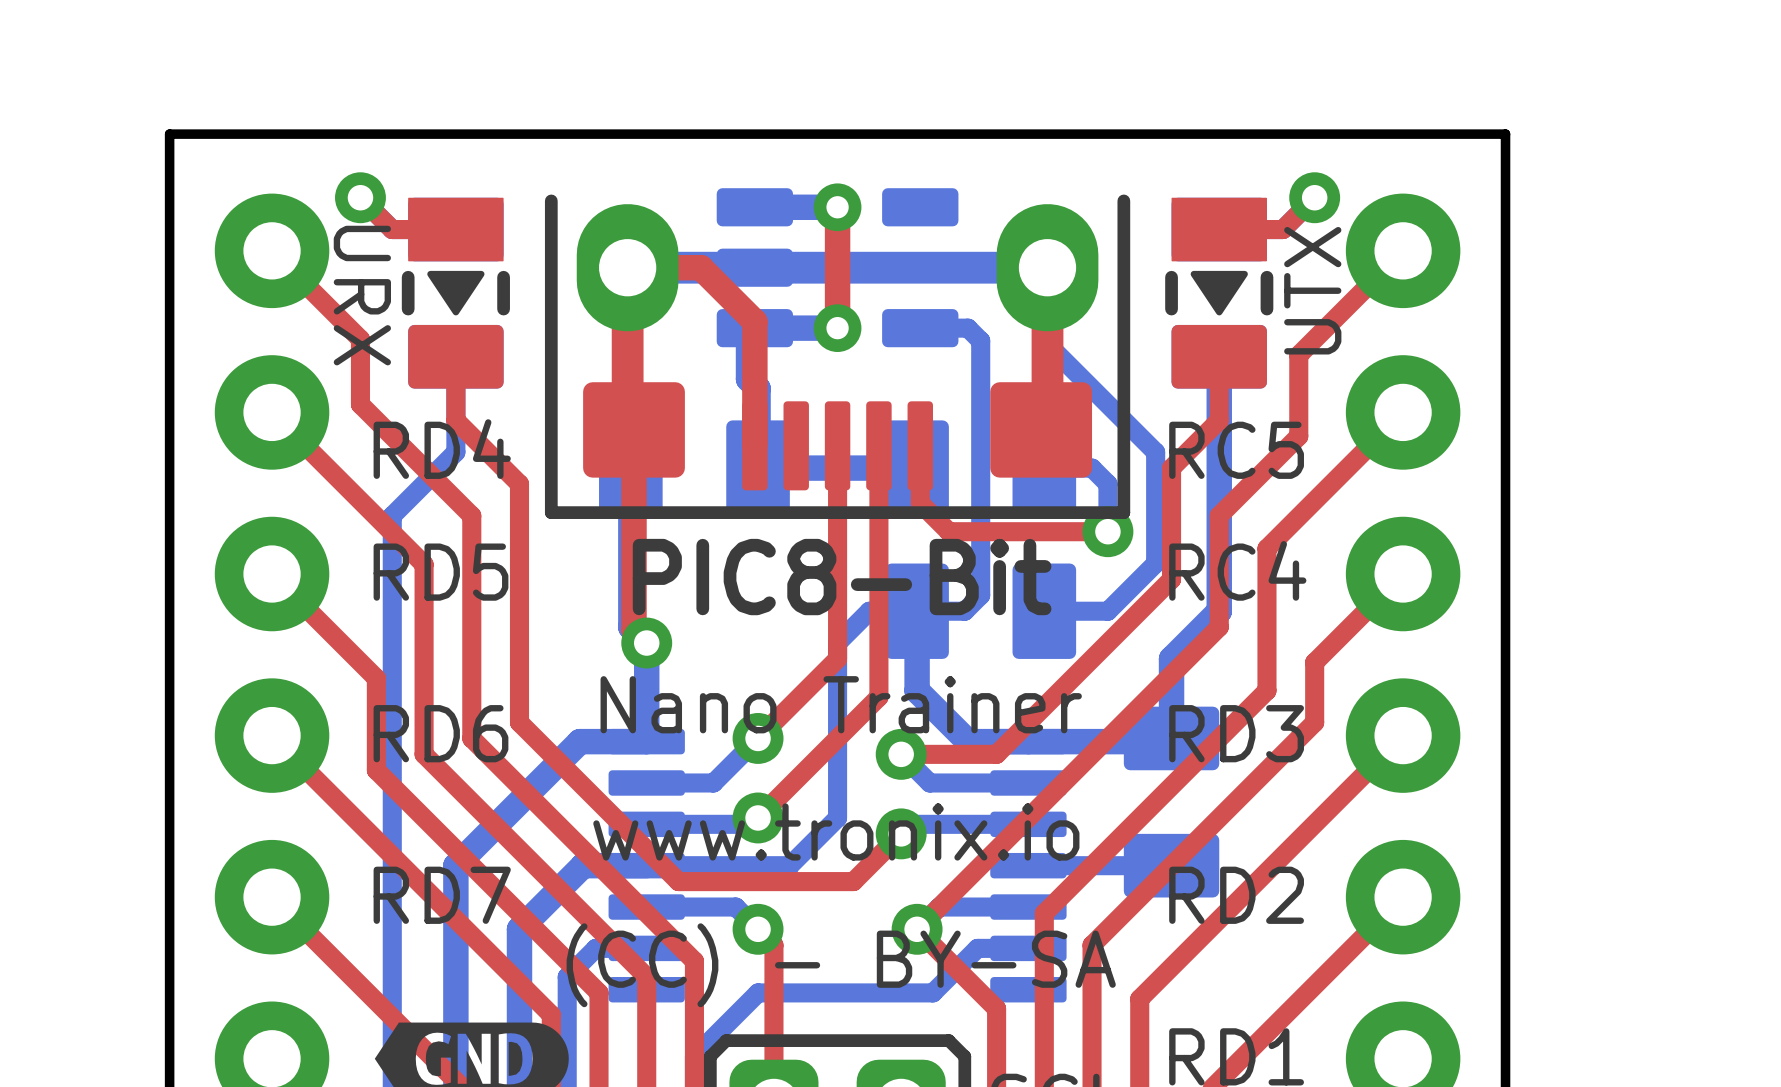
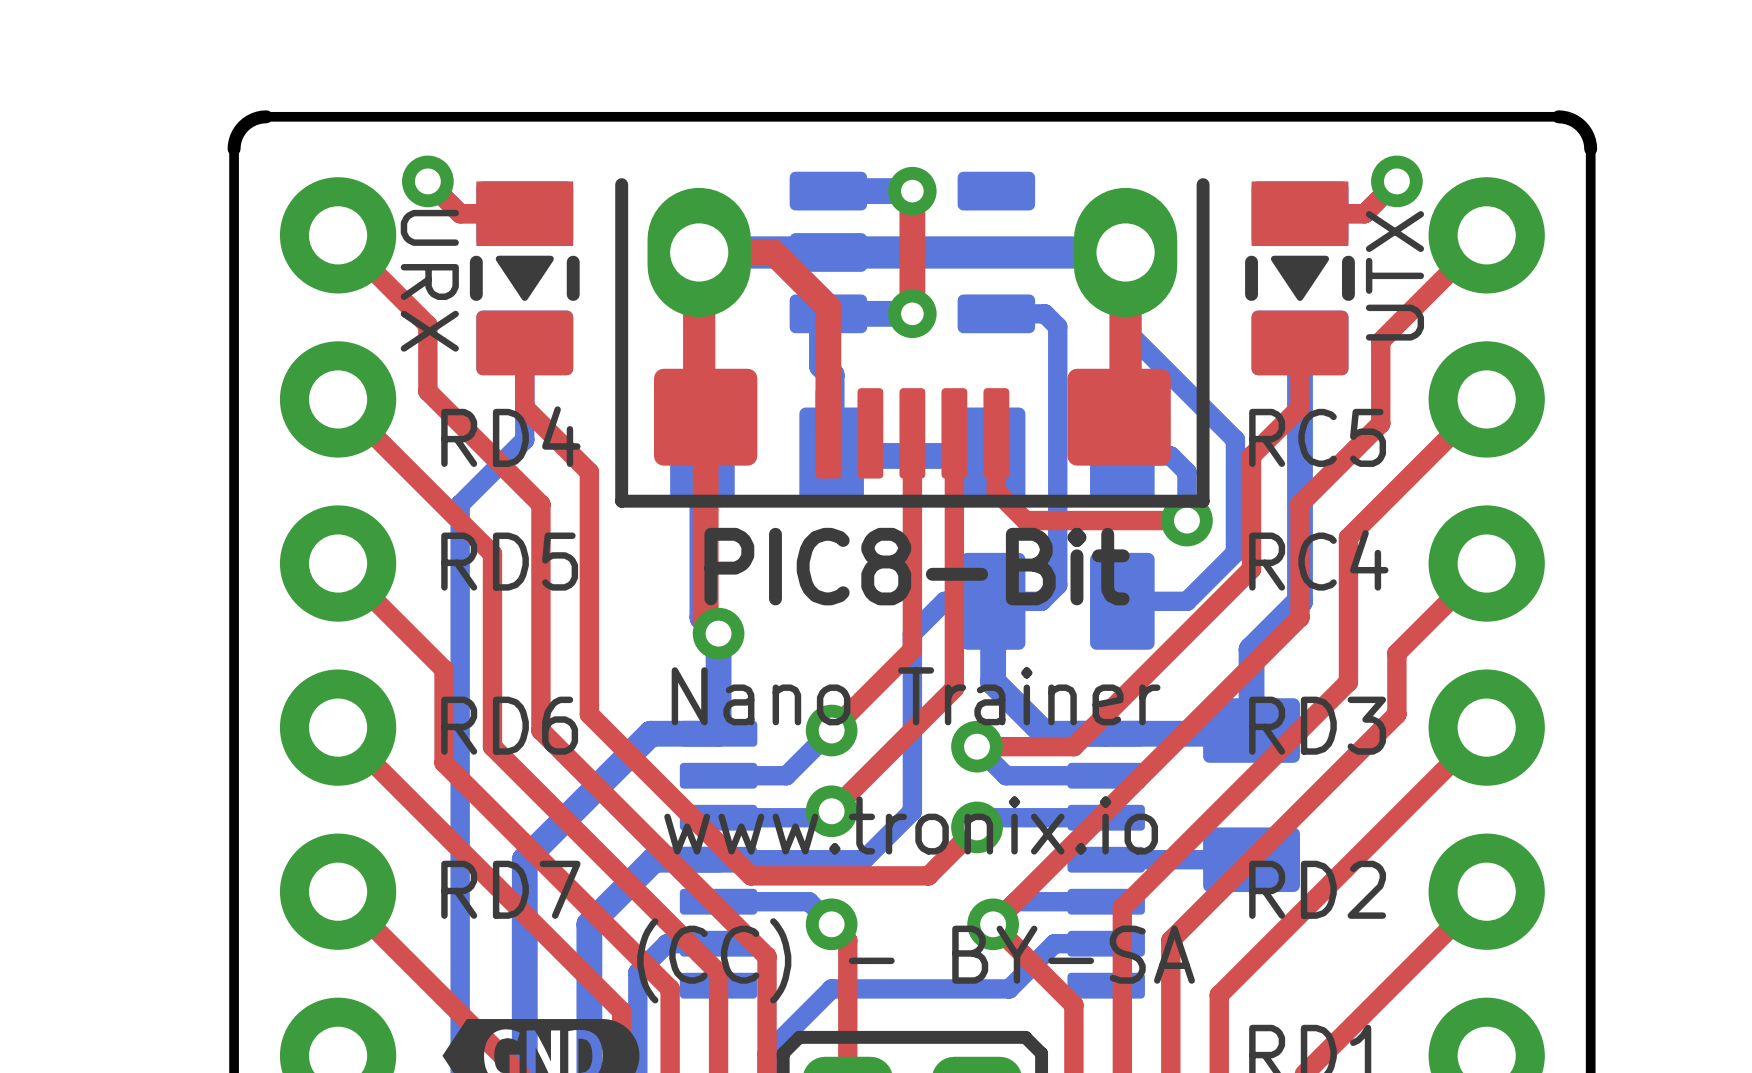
board edge: (201, 134) (169, 134) (169, 165) -> (266, 116) (254, 119) (243, 126) (236, 136) (234, 149)
board edge: (1473, 134) (1505, 134) (1505, 165) -> (1558, 116) (1570, 119) (1581, 126) (1588, 136) (1590, 149)

